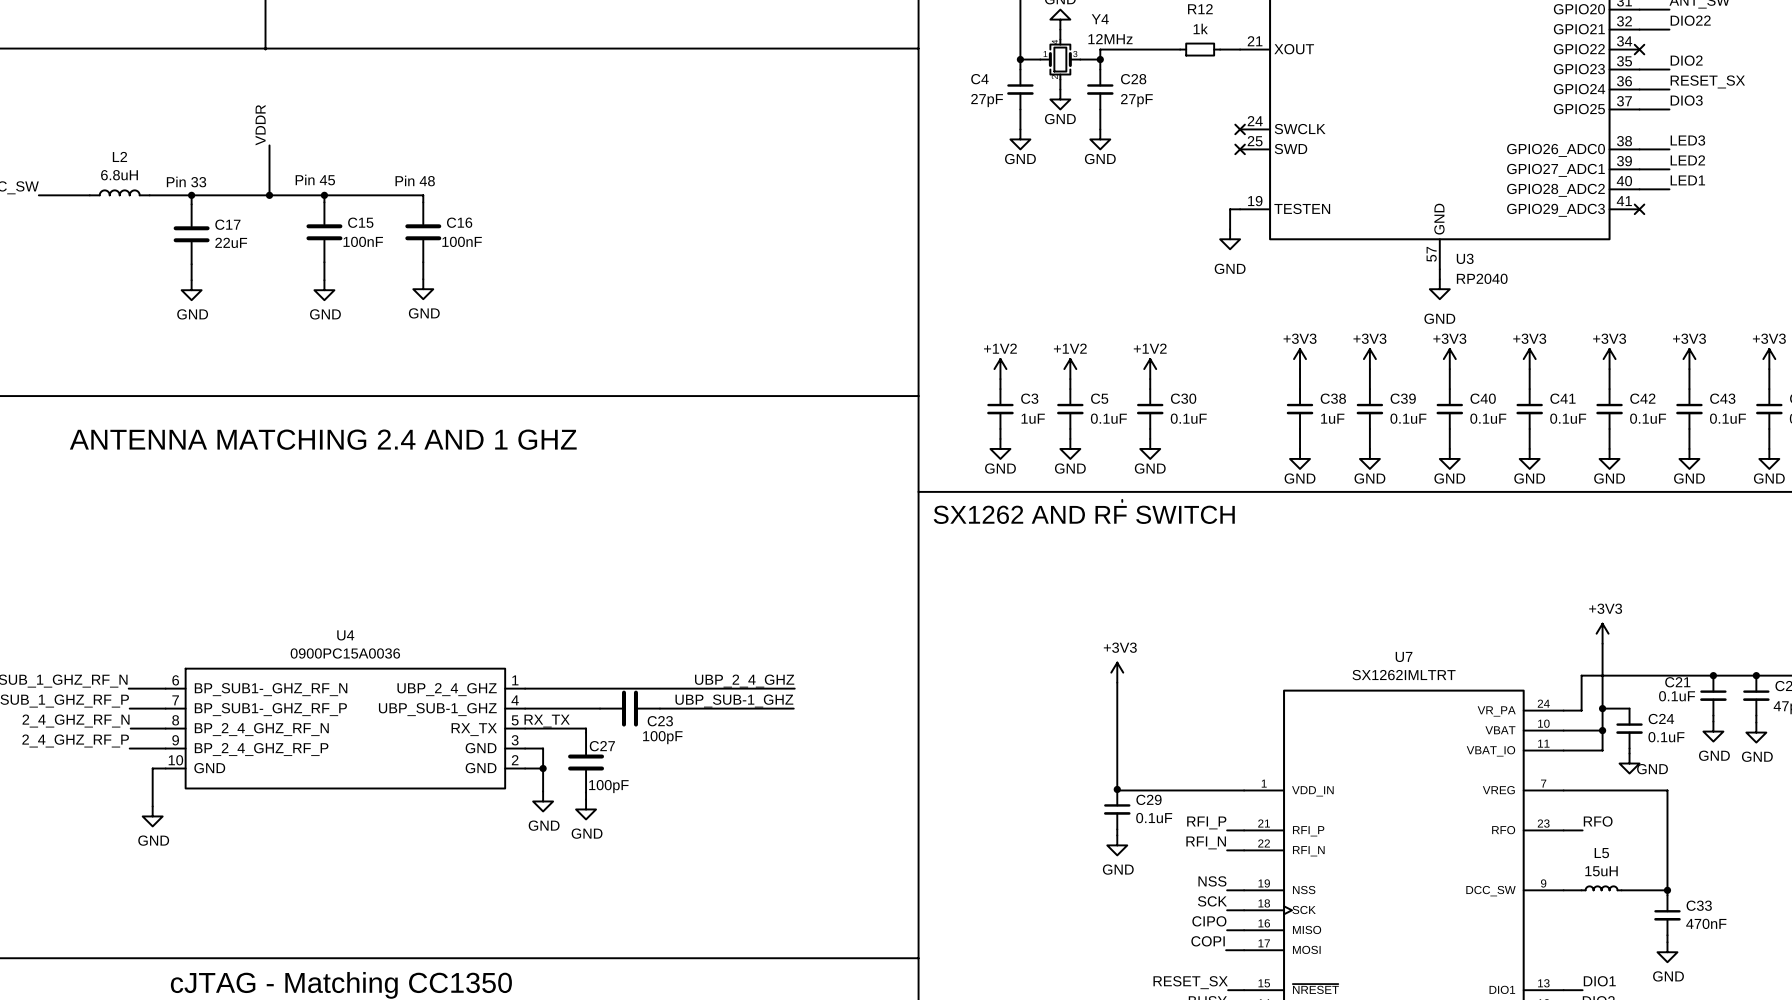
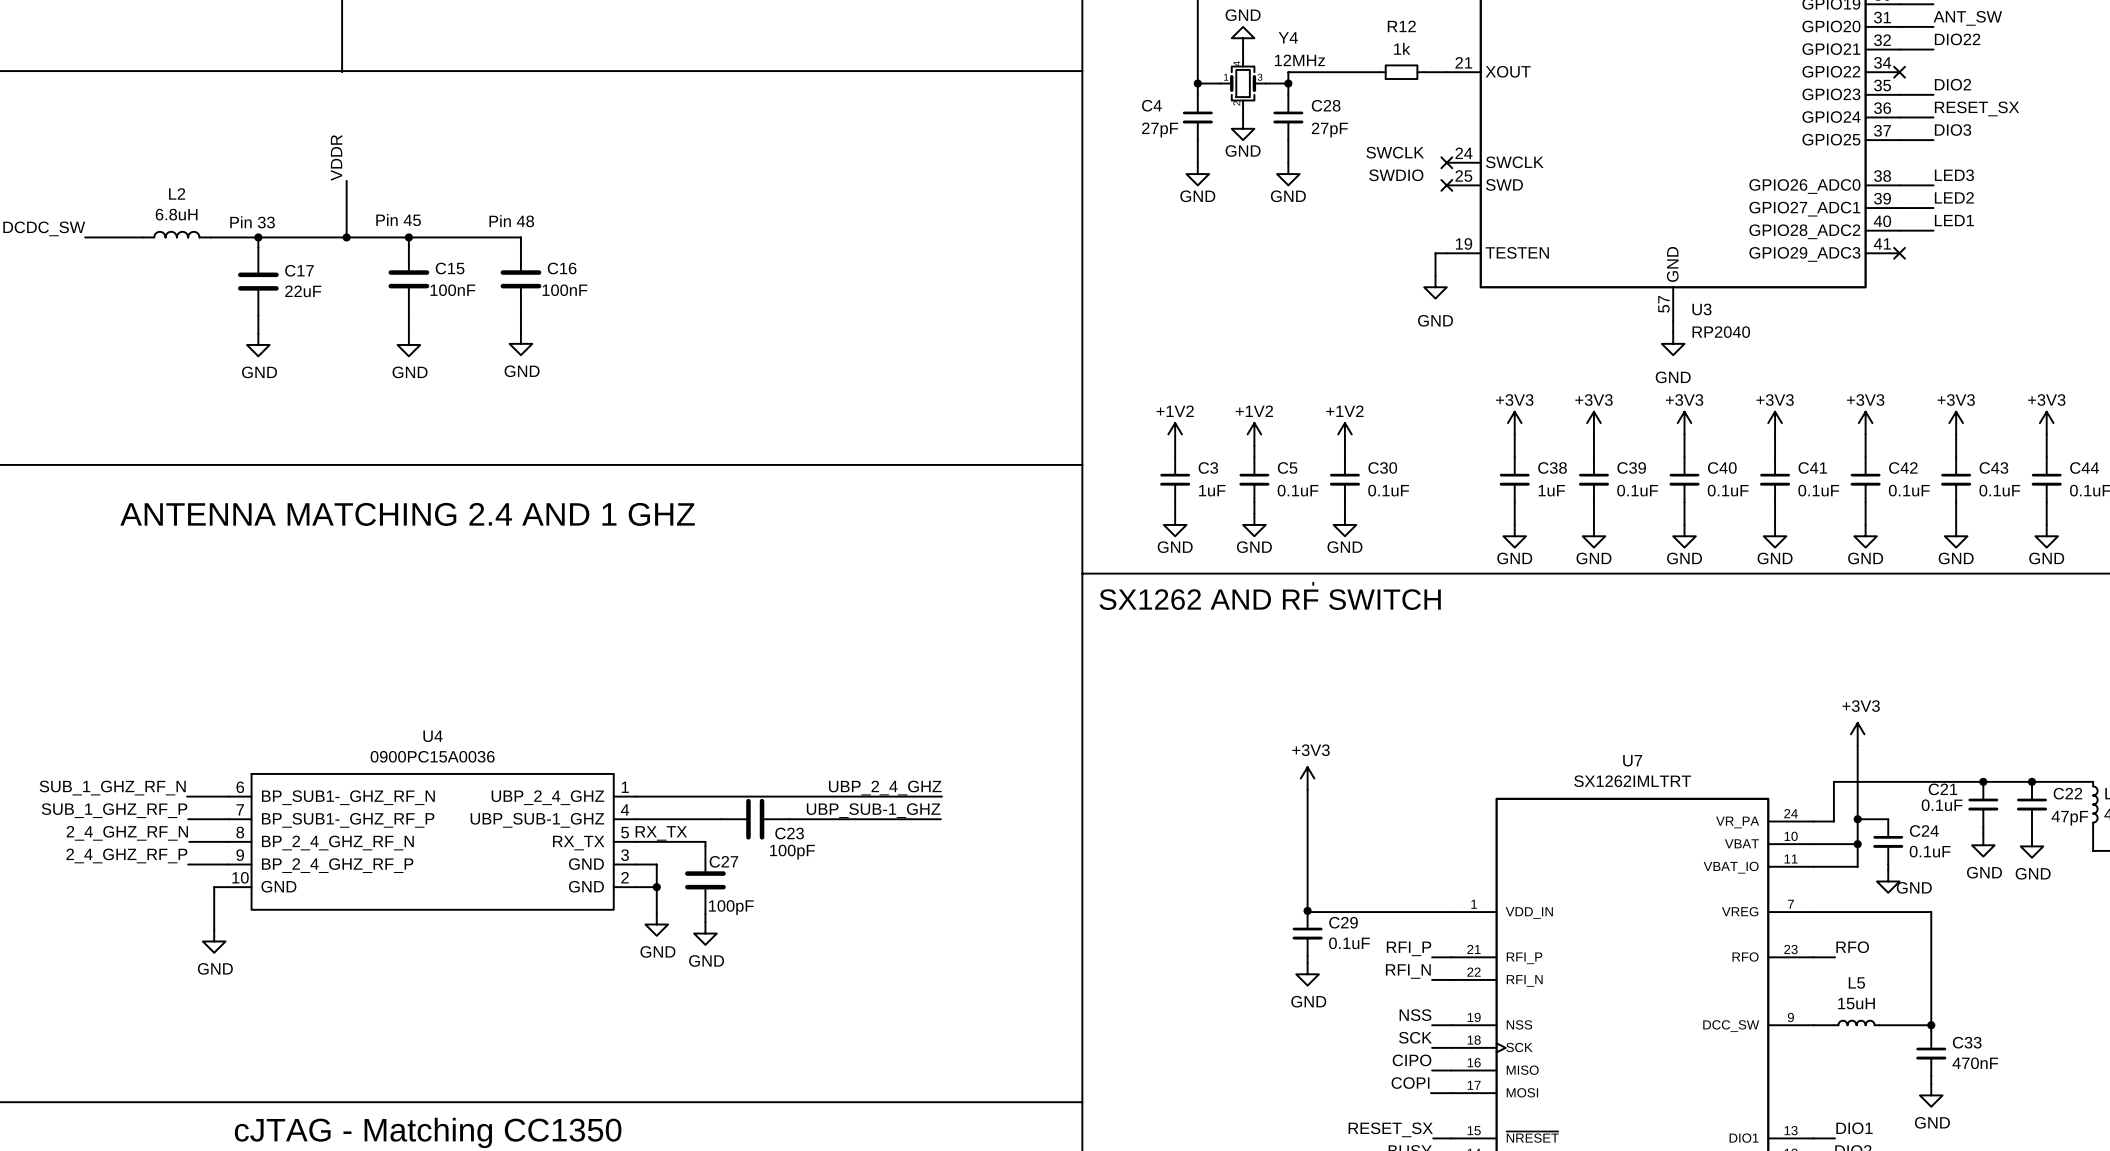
label: none -> SWCLK (1395, 152)
label: none -> SWDIO (1396, 175)

